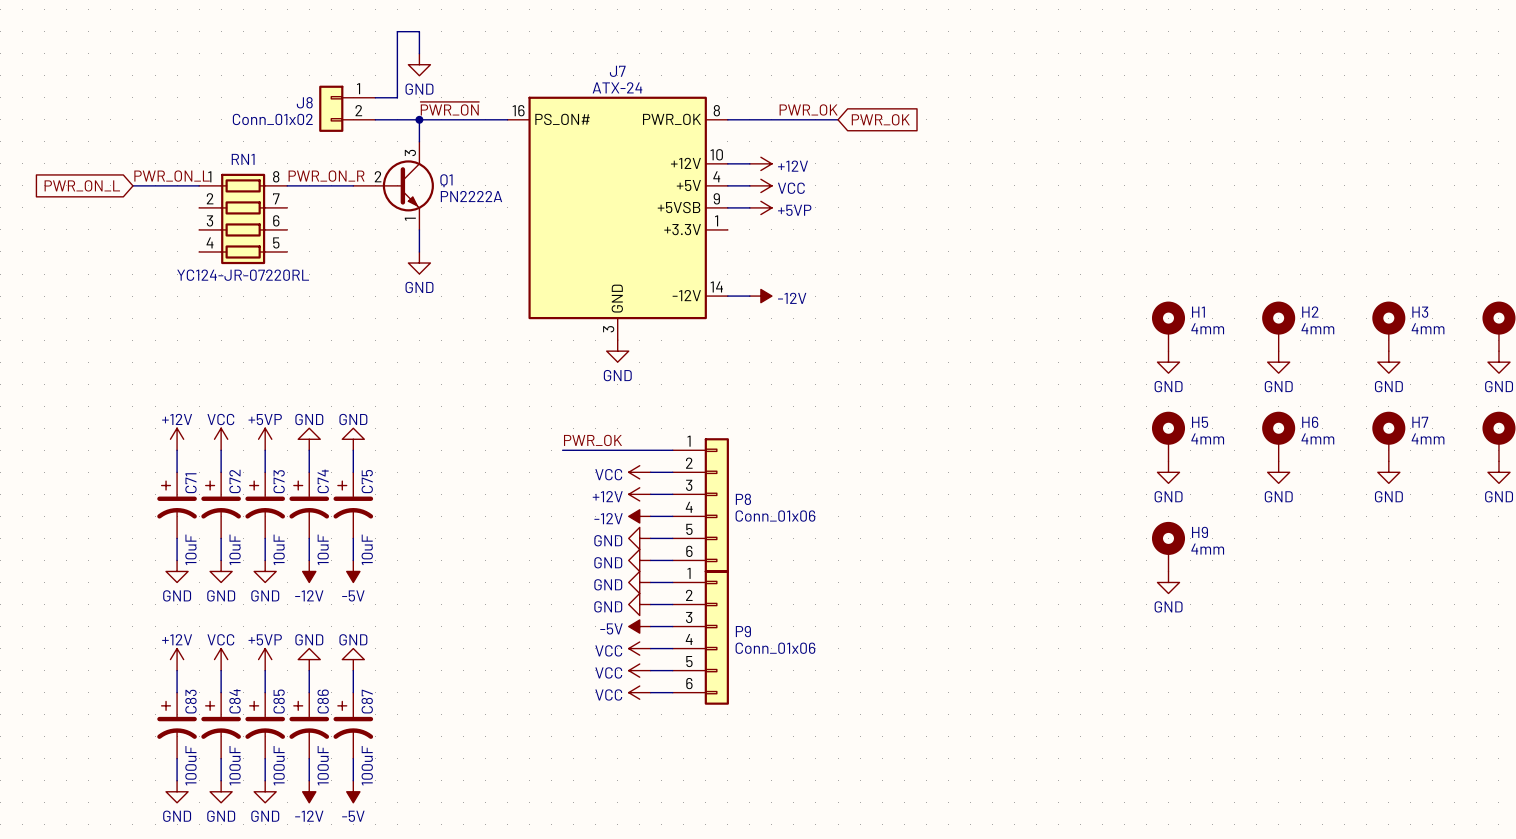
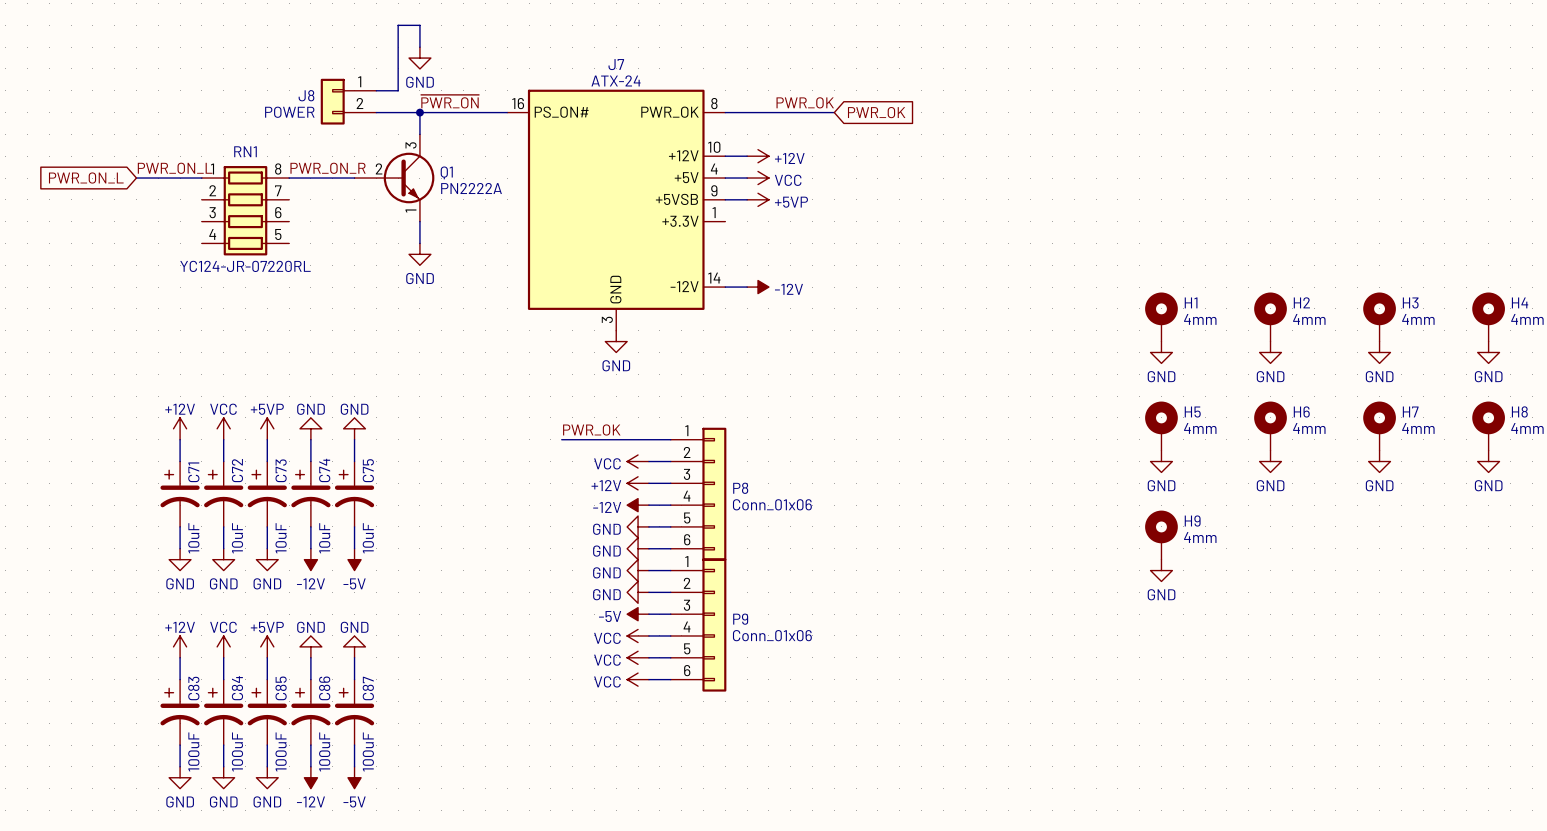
J8 value: Conn_01x02 (272, 119) -> POWER (289, 112)

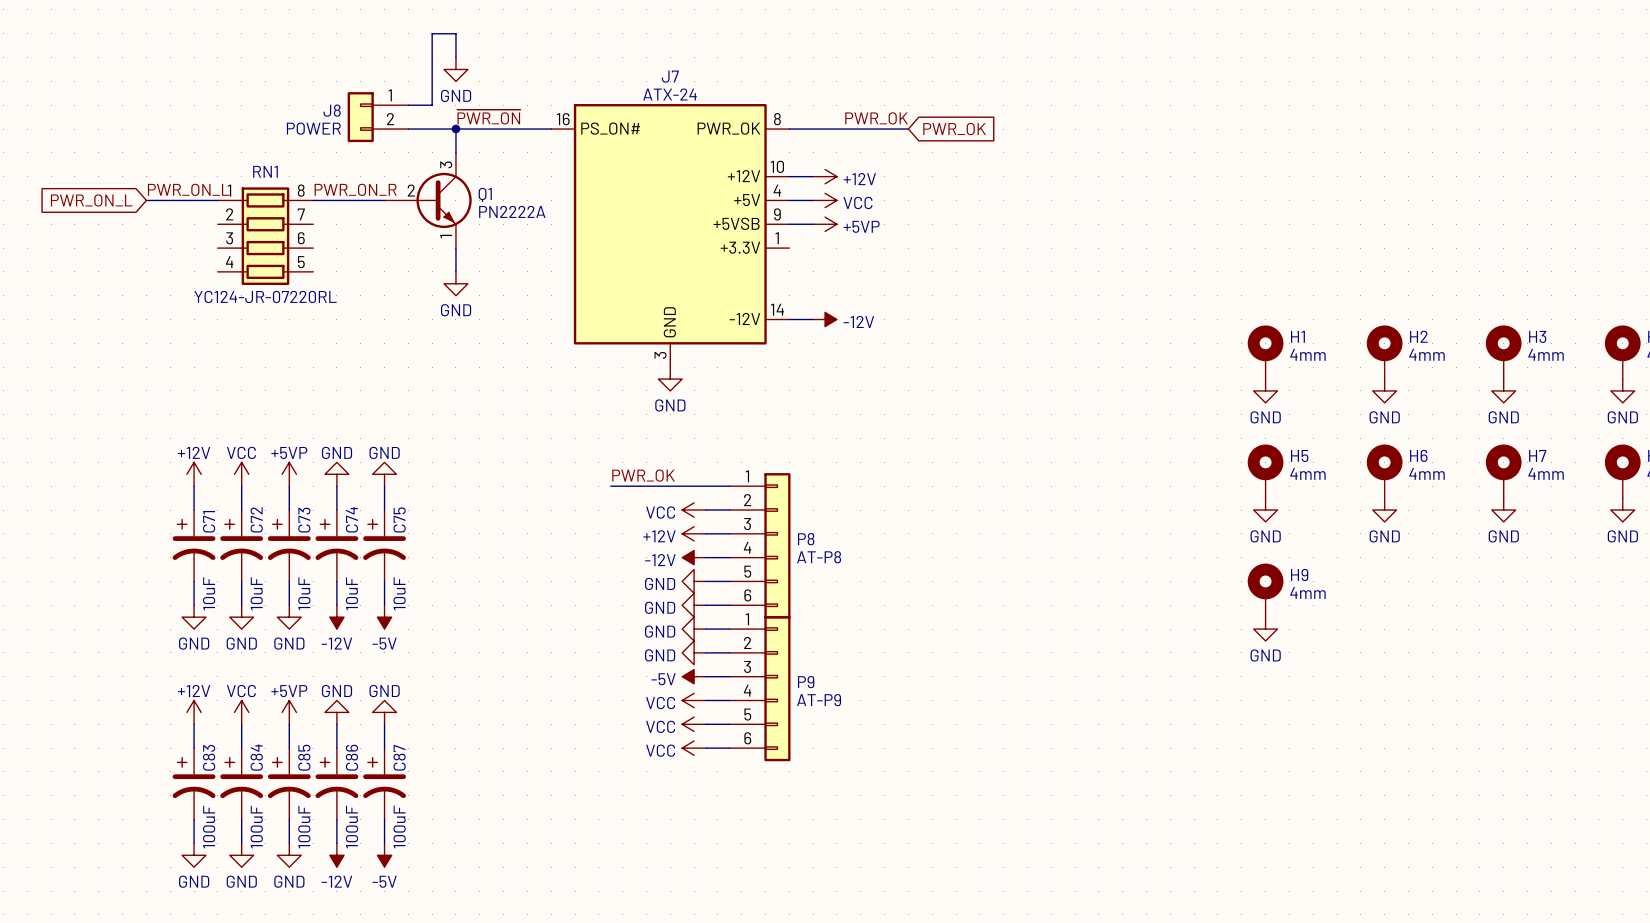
P8 value: Conn_01x06 (772, 504) -> AT-P8 (819, 557)
P9 value: Conn_01x06 (772, 635) -> AT-P9 (819, 700)

